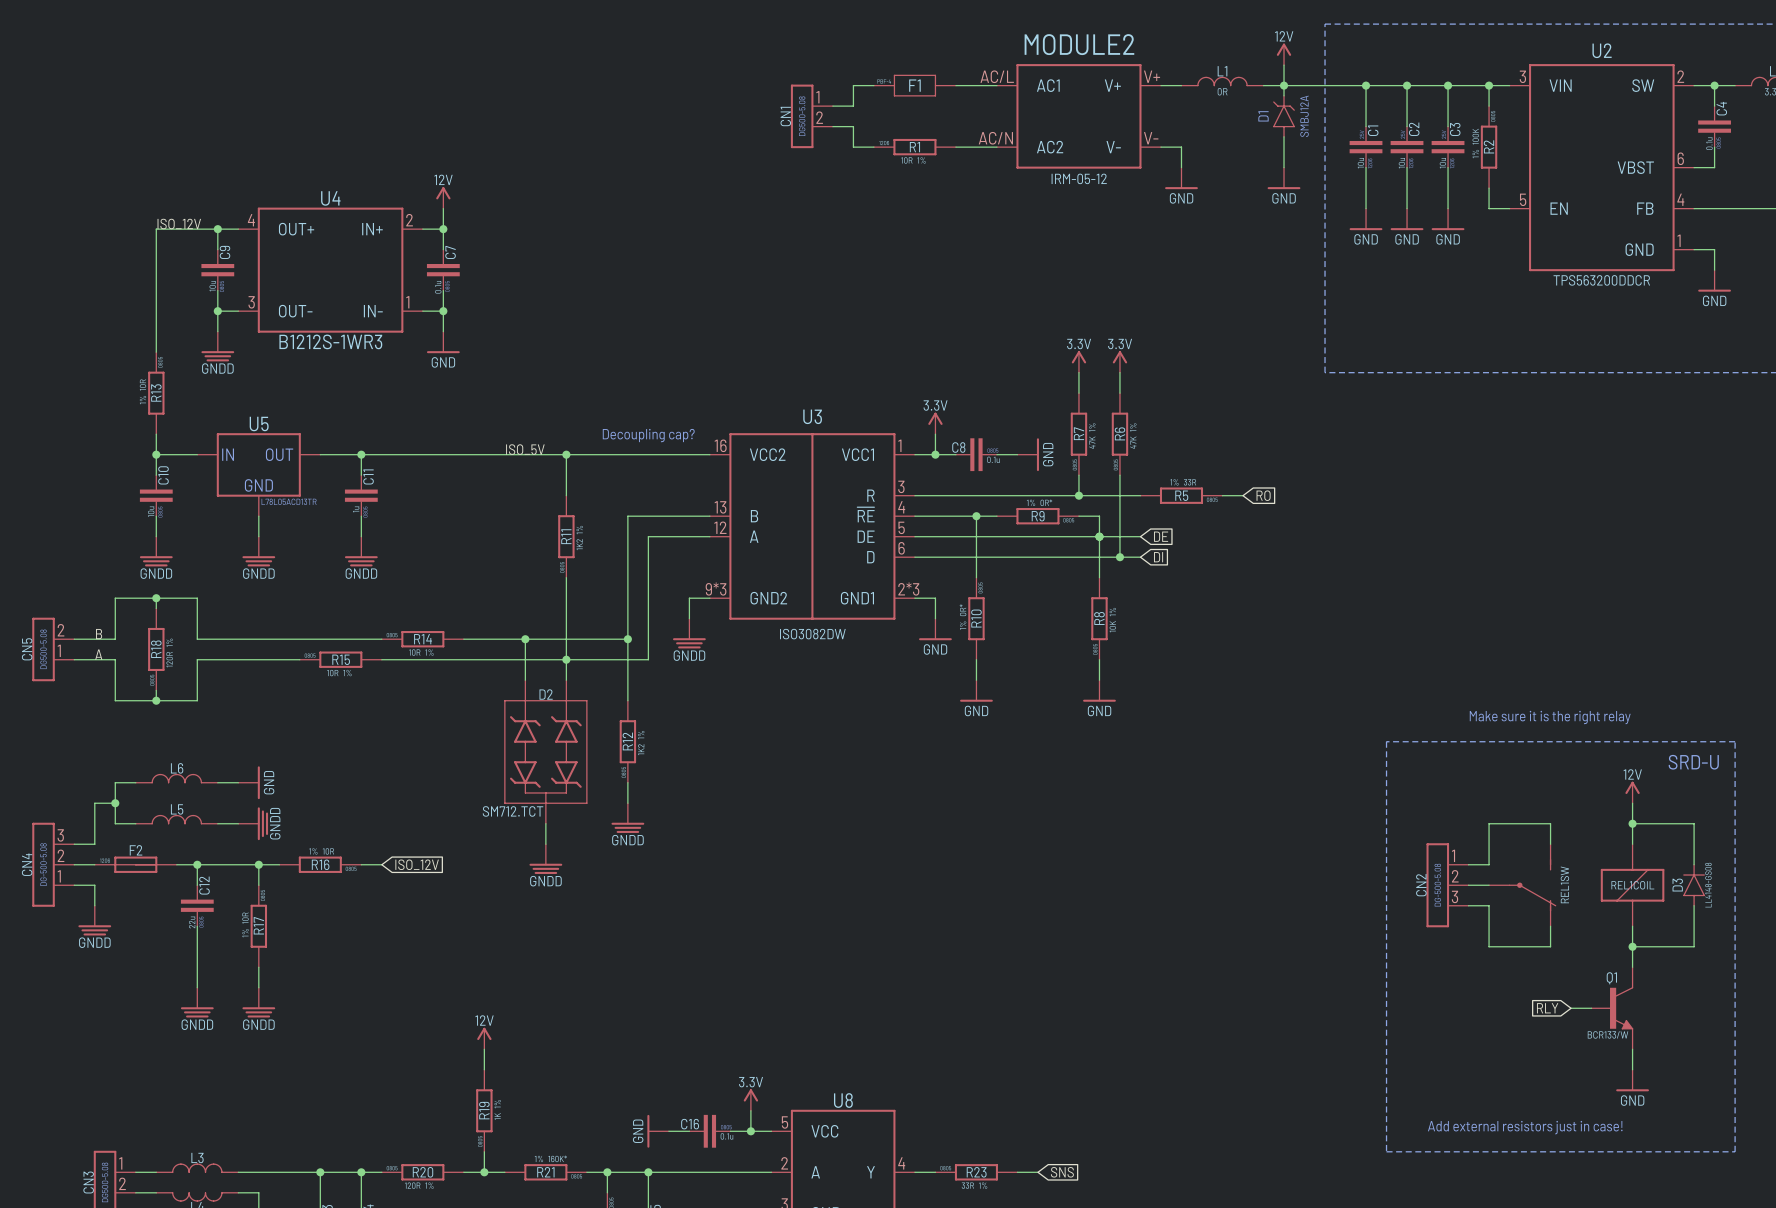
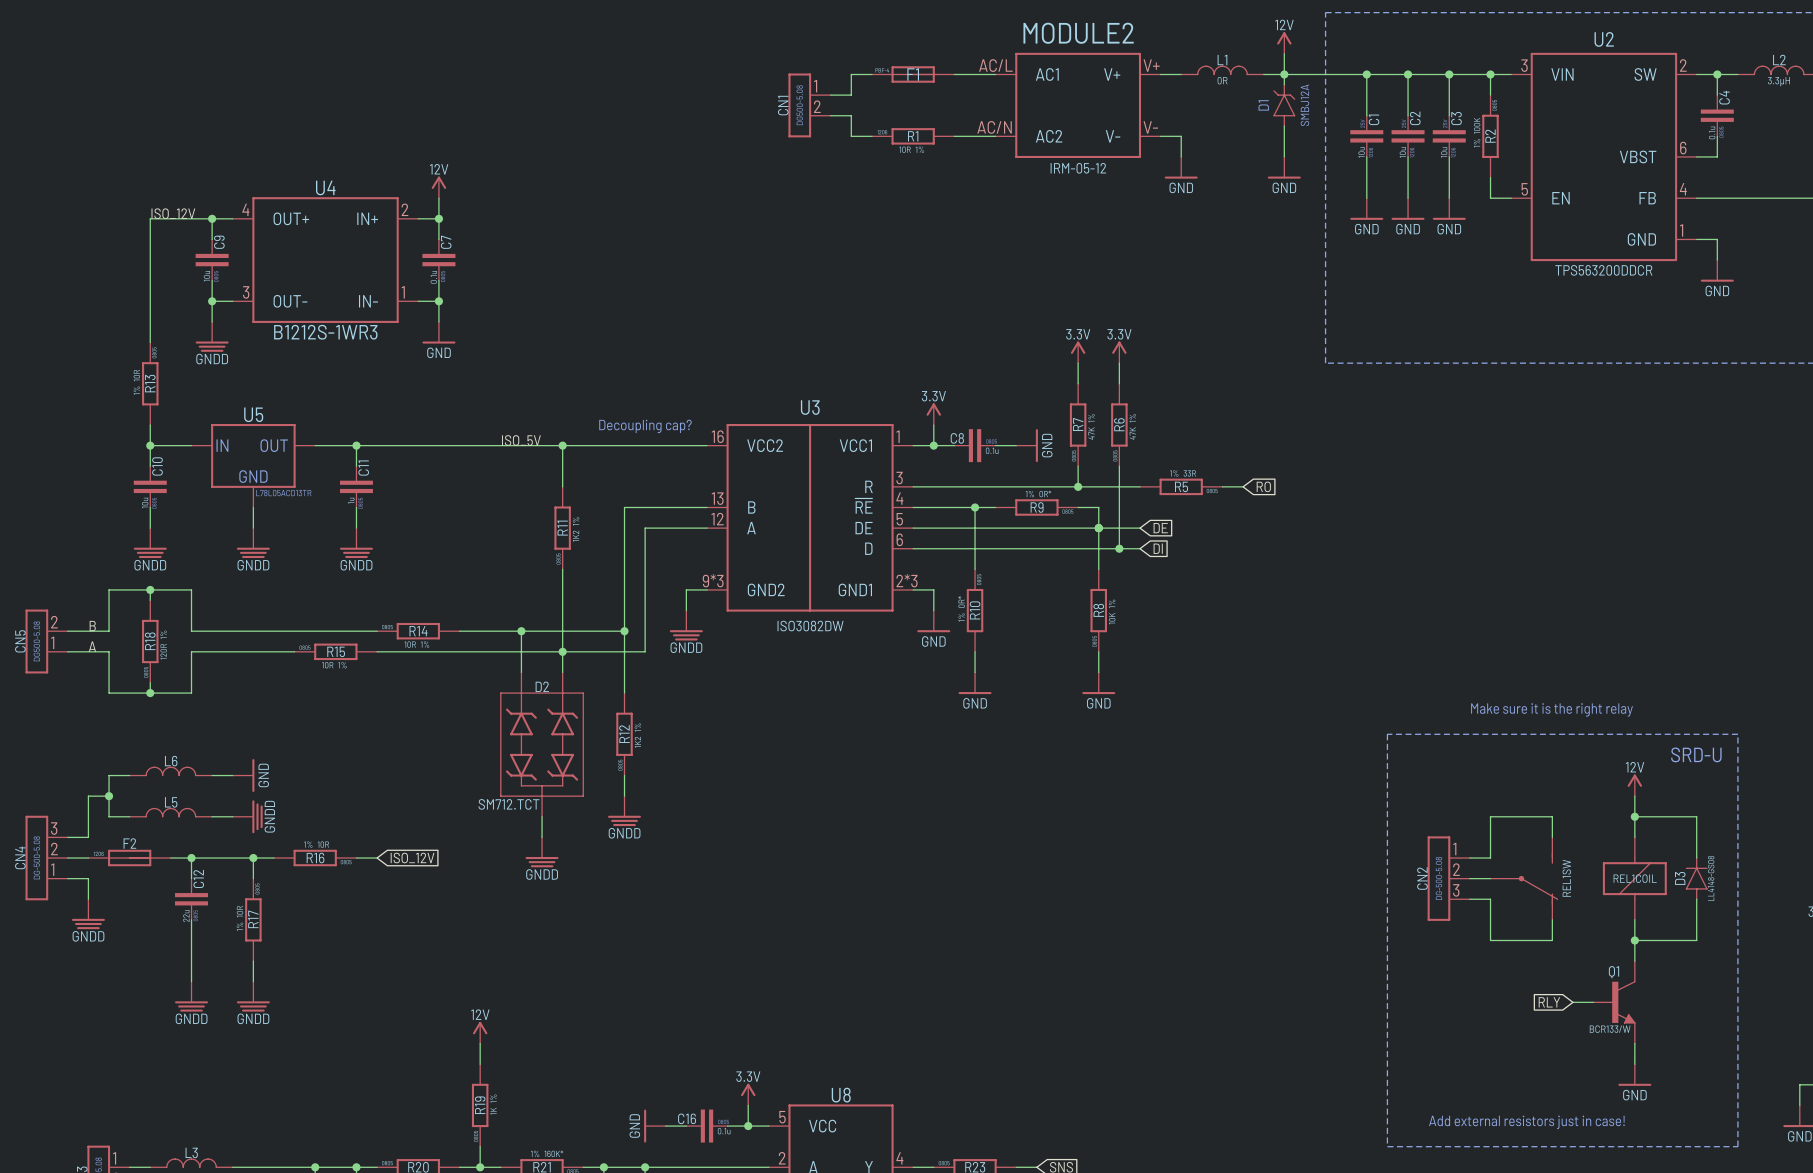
F1 symbol: [873, 74, 956, 97] -> [871, 66, 955, 83]

